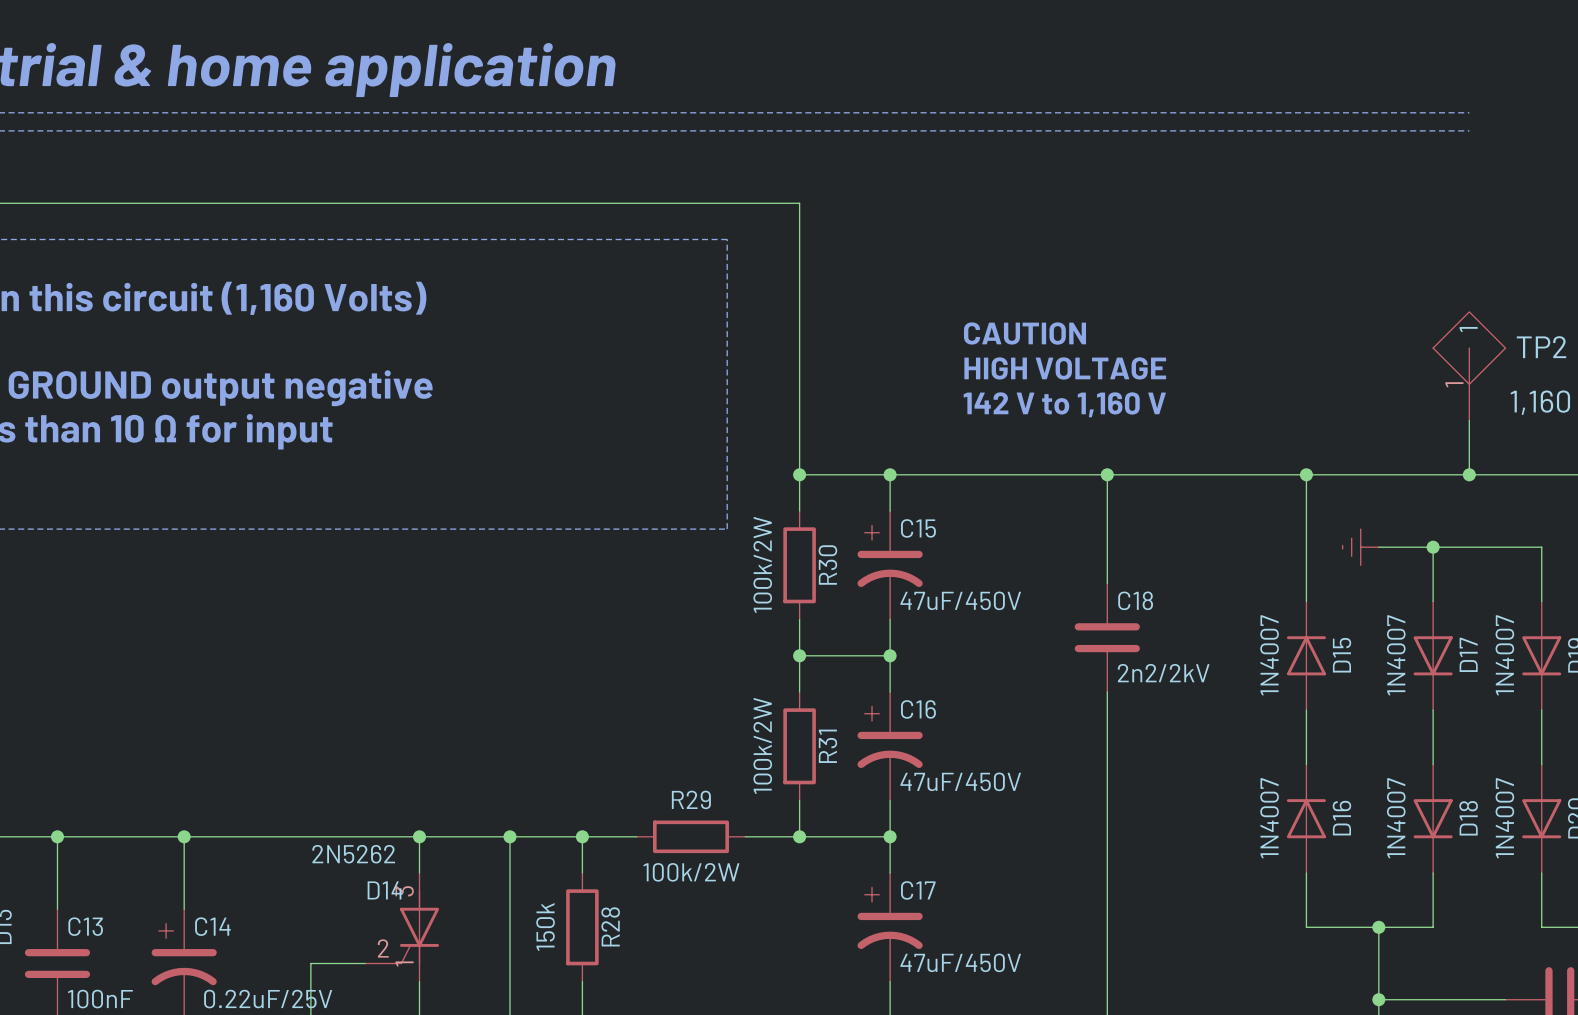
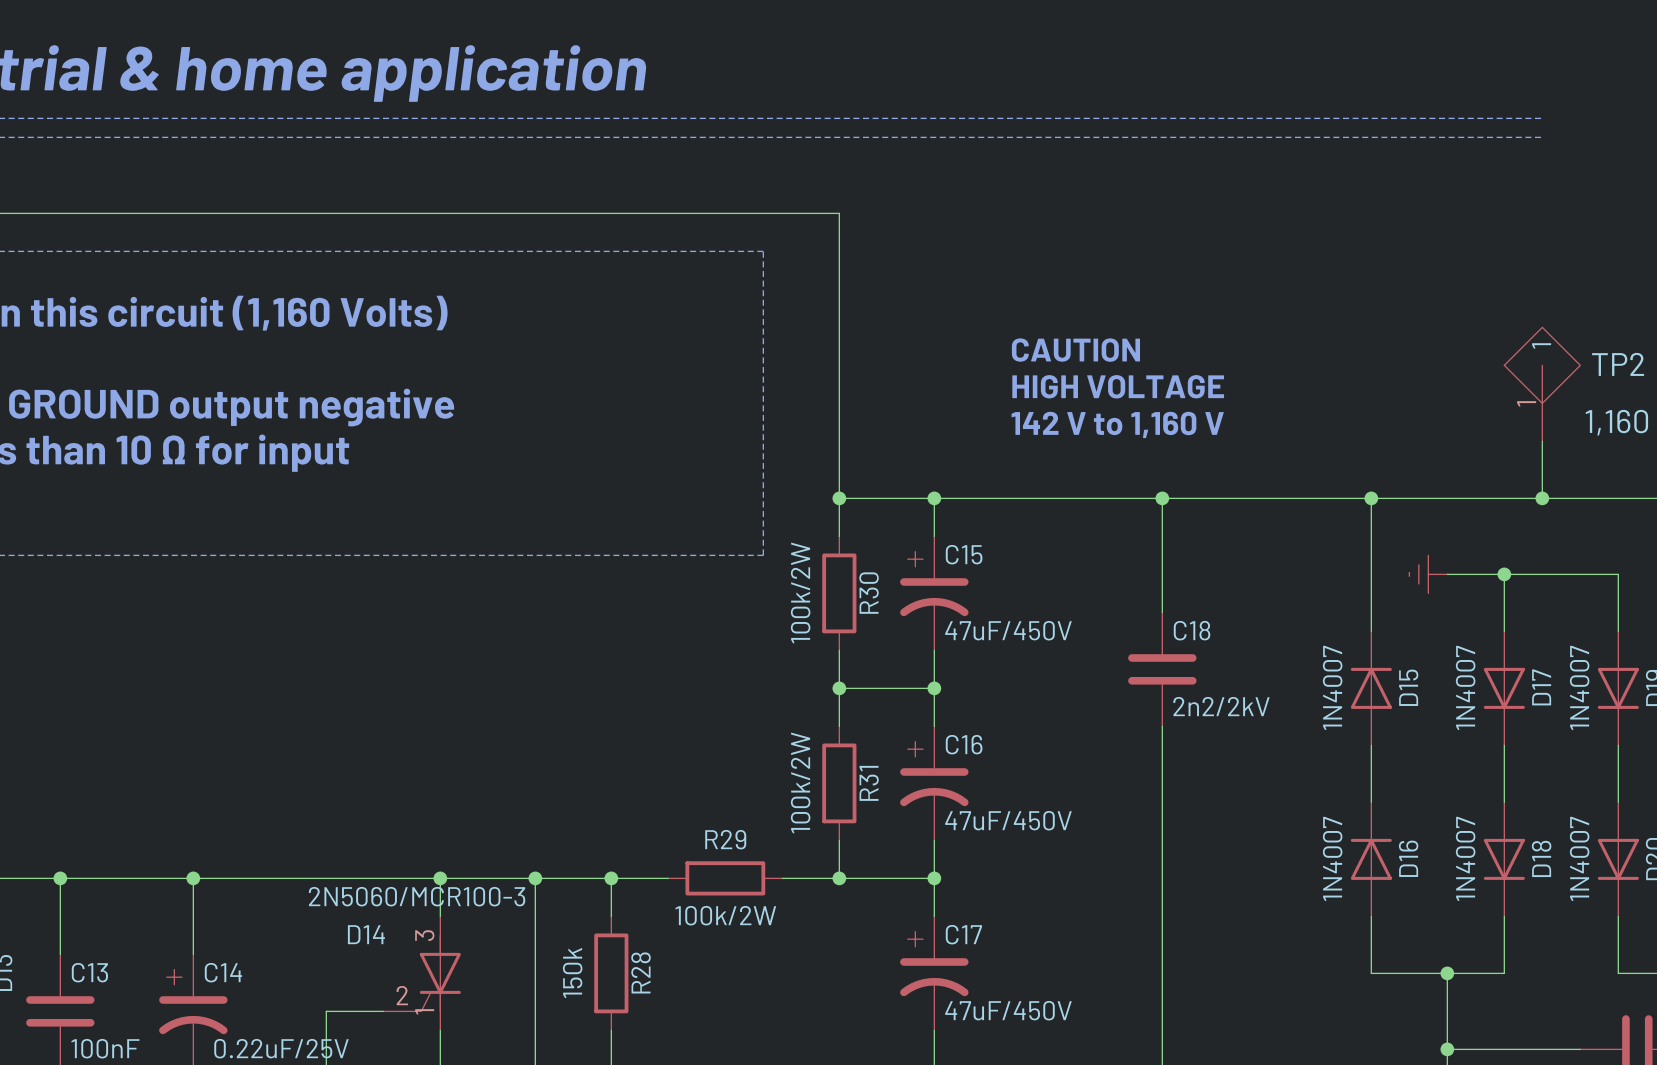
D14 value: 2N5262 (353, 854) -> 2N5060/MCR100-3 (417, 896)
D14 name position: D14 (385, 890) -> D14 (366, 934)

